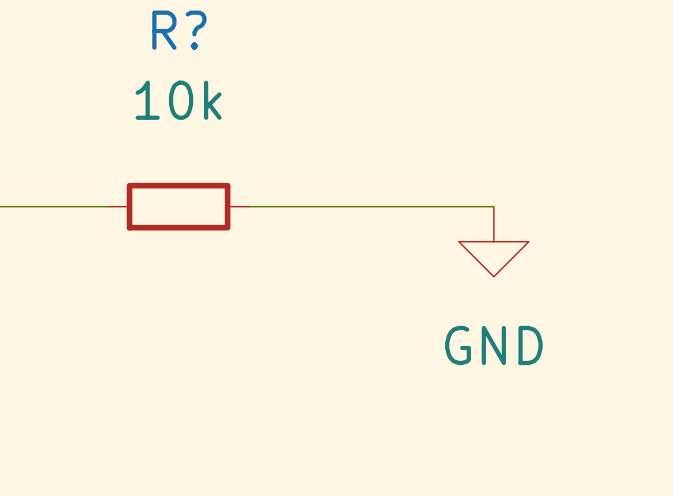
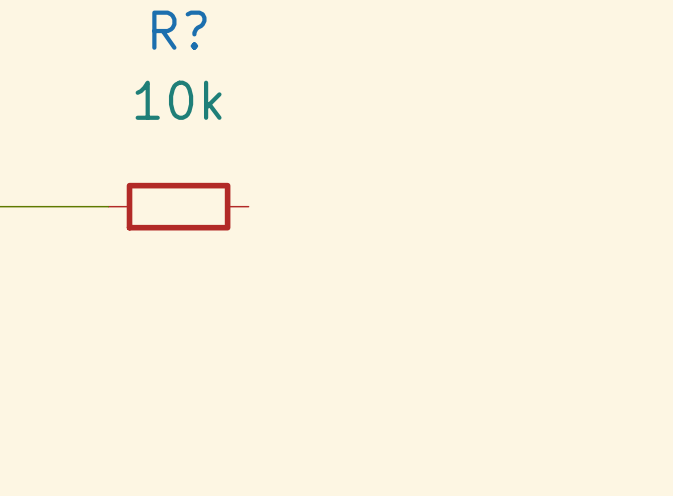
wire: (248, 206) (493, 206) -> none
power symbol: GND (493, 241) -> none

